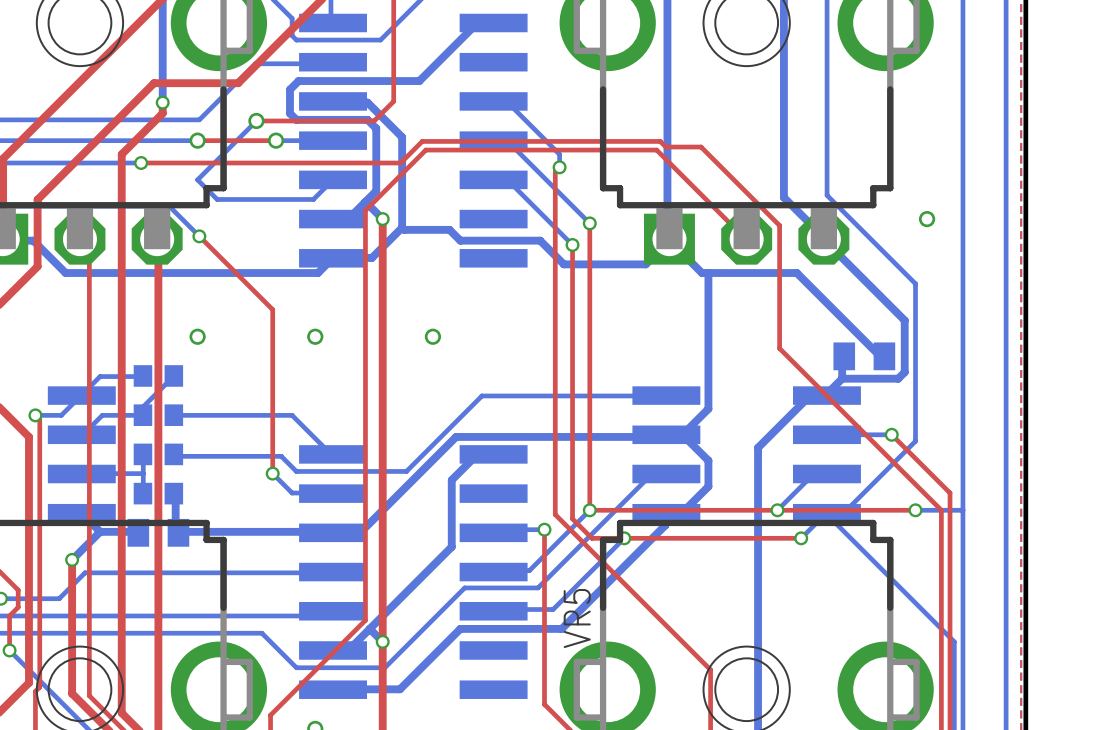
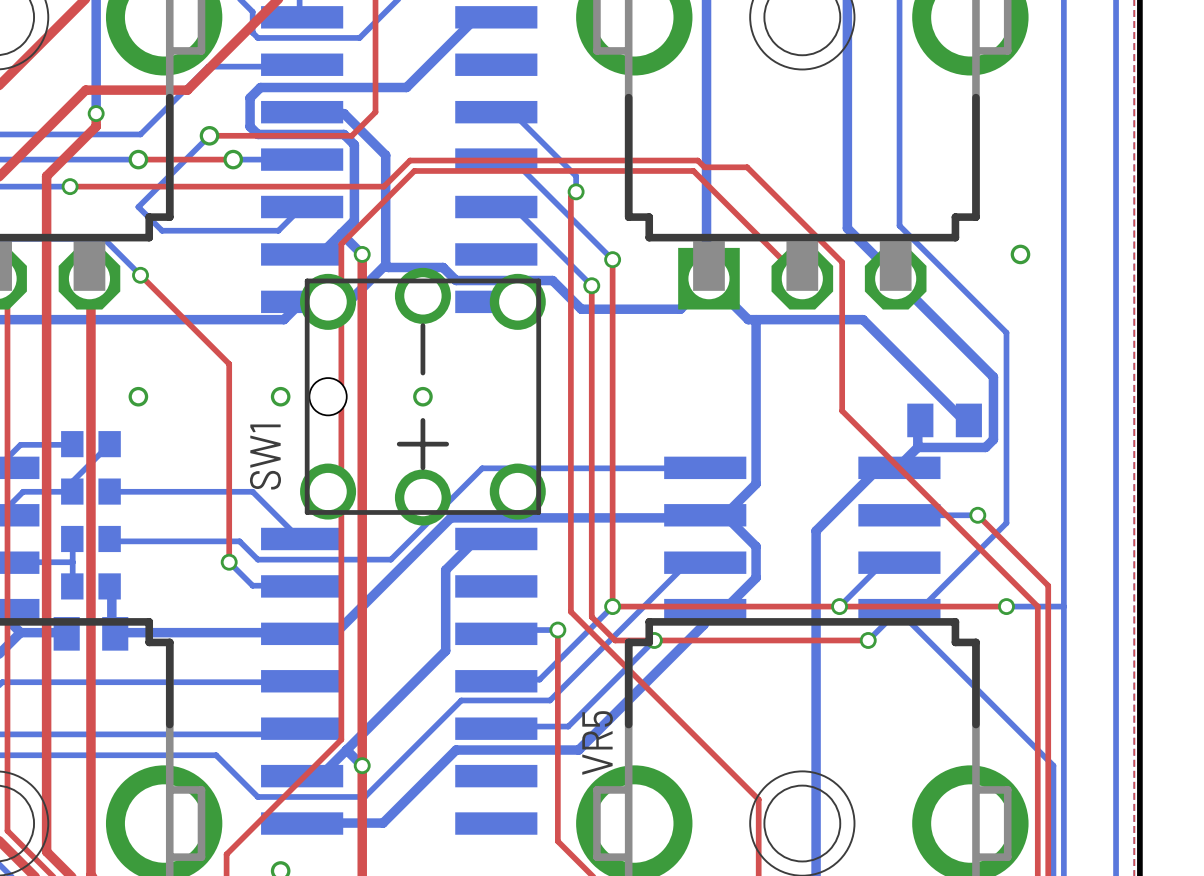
SW1: none -> (422, 396)

